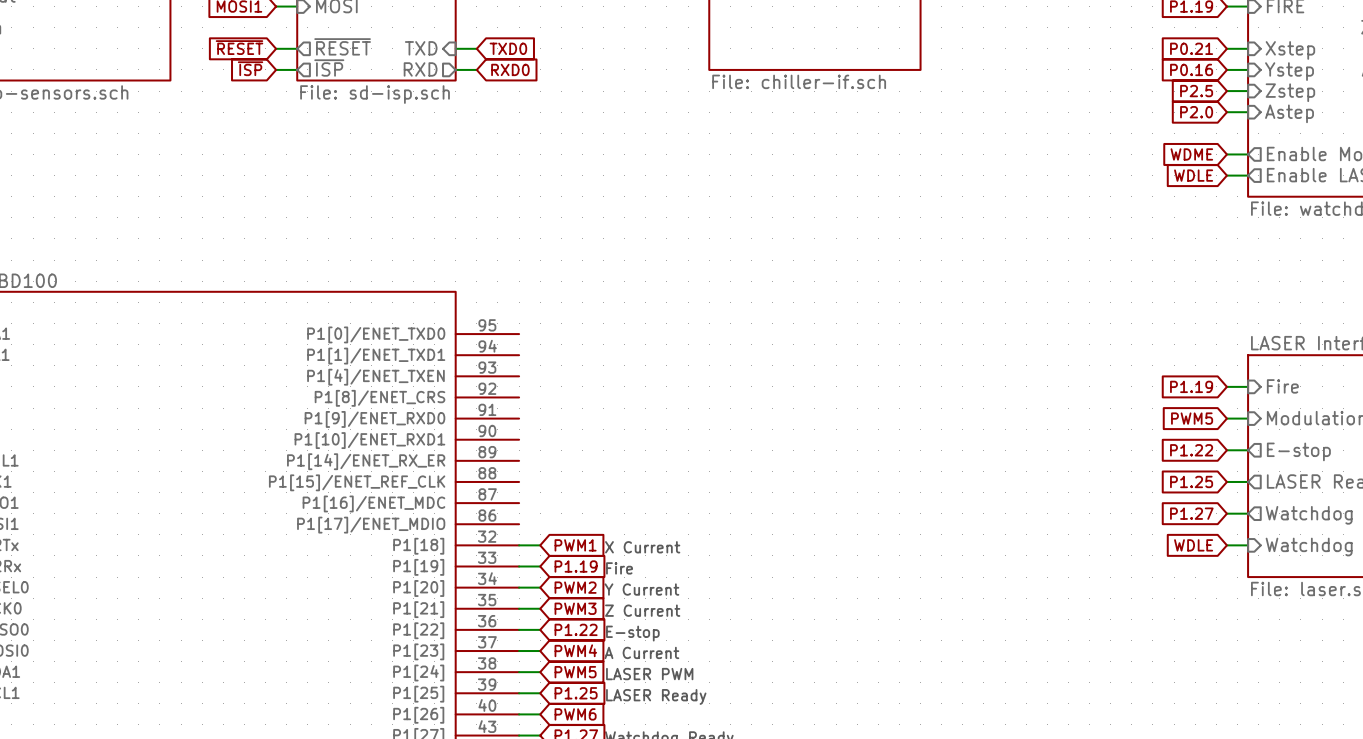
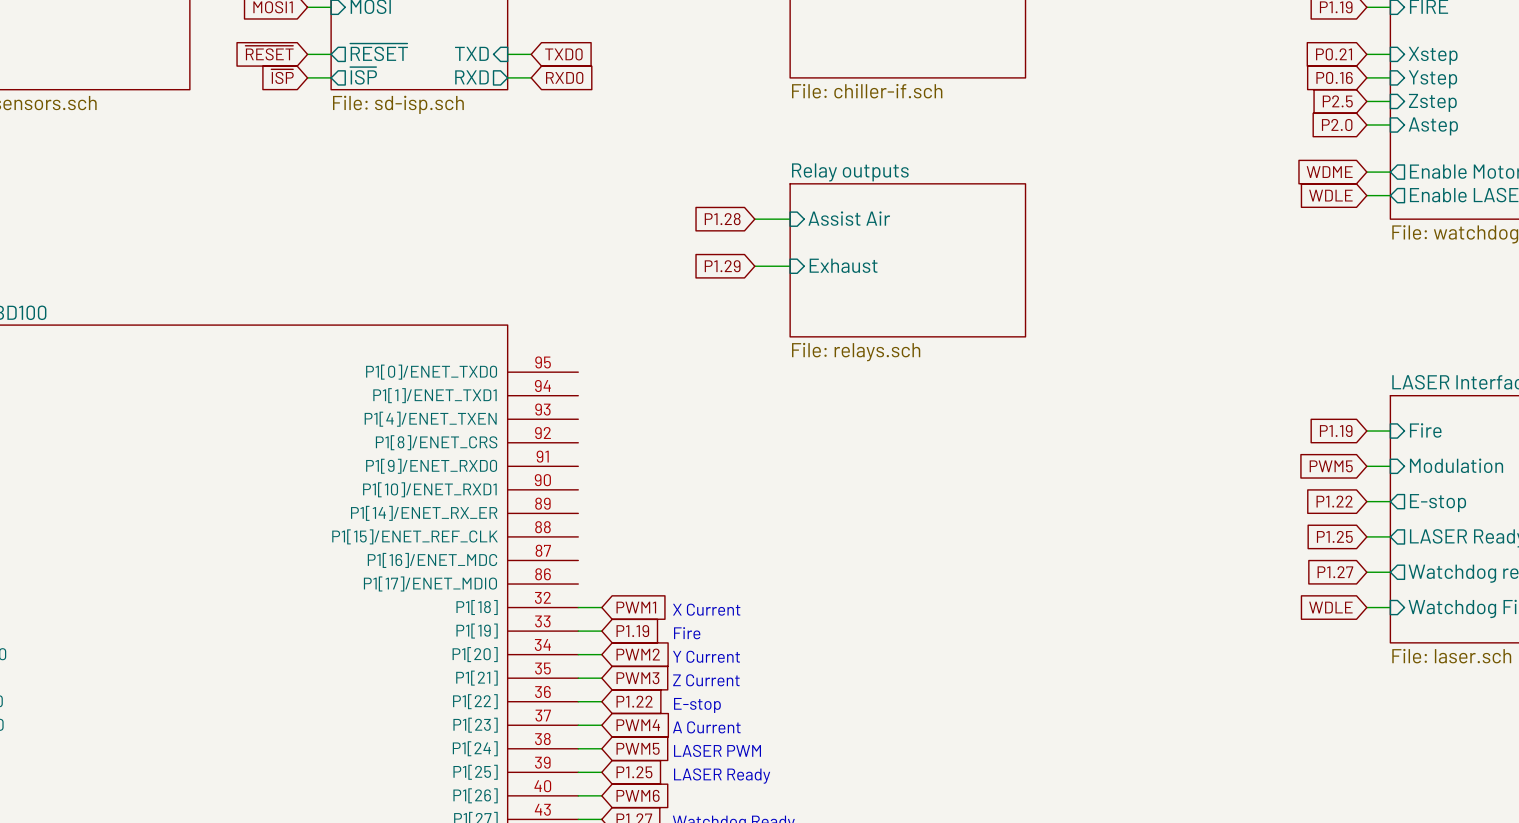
global label: none -> P1.28 (722, 219)
wire: none -> (754, 219) (790, 219)
sheet pin: none -> Assist Air (849, 218)
sheet Relay outputs: none -> File: relays.sch (907, 260)
global label: none -> P1.29 (722, 266)
wire: none -> (754, 266) (790, 266)
sheet pin: none -> Exhaust (843, 265)

